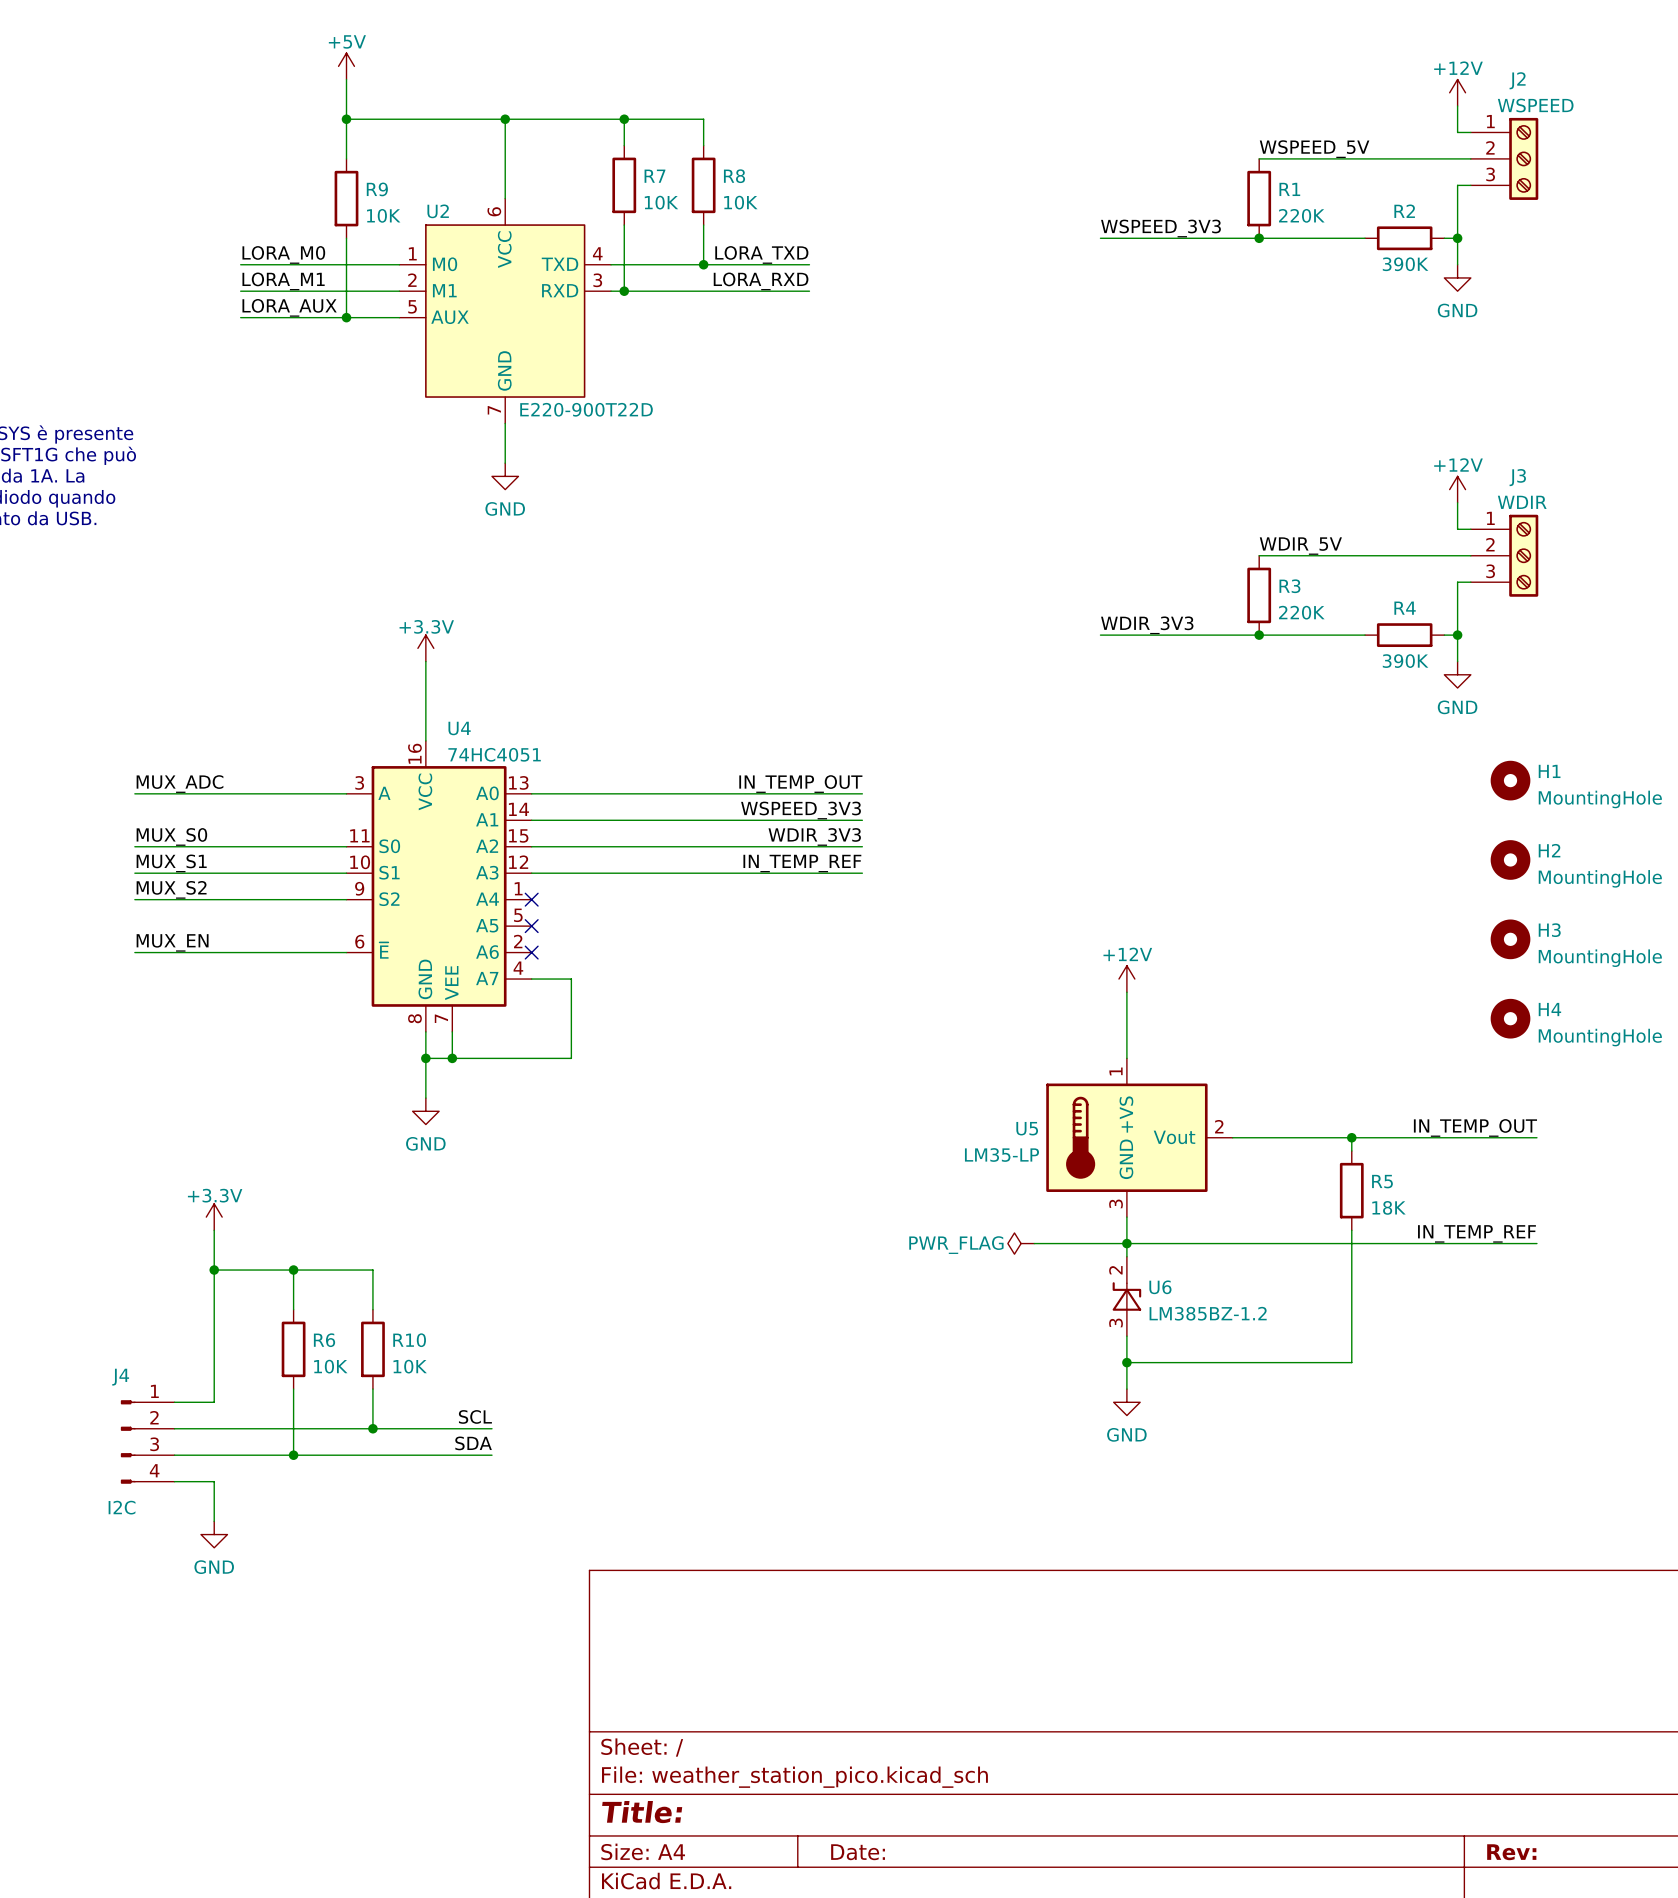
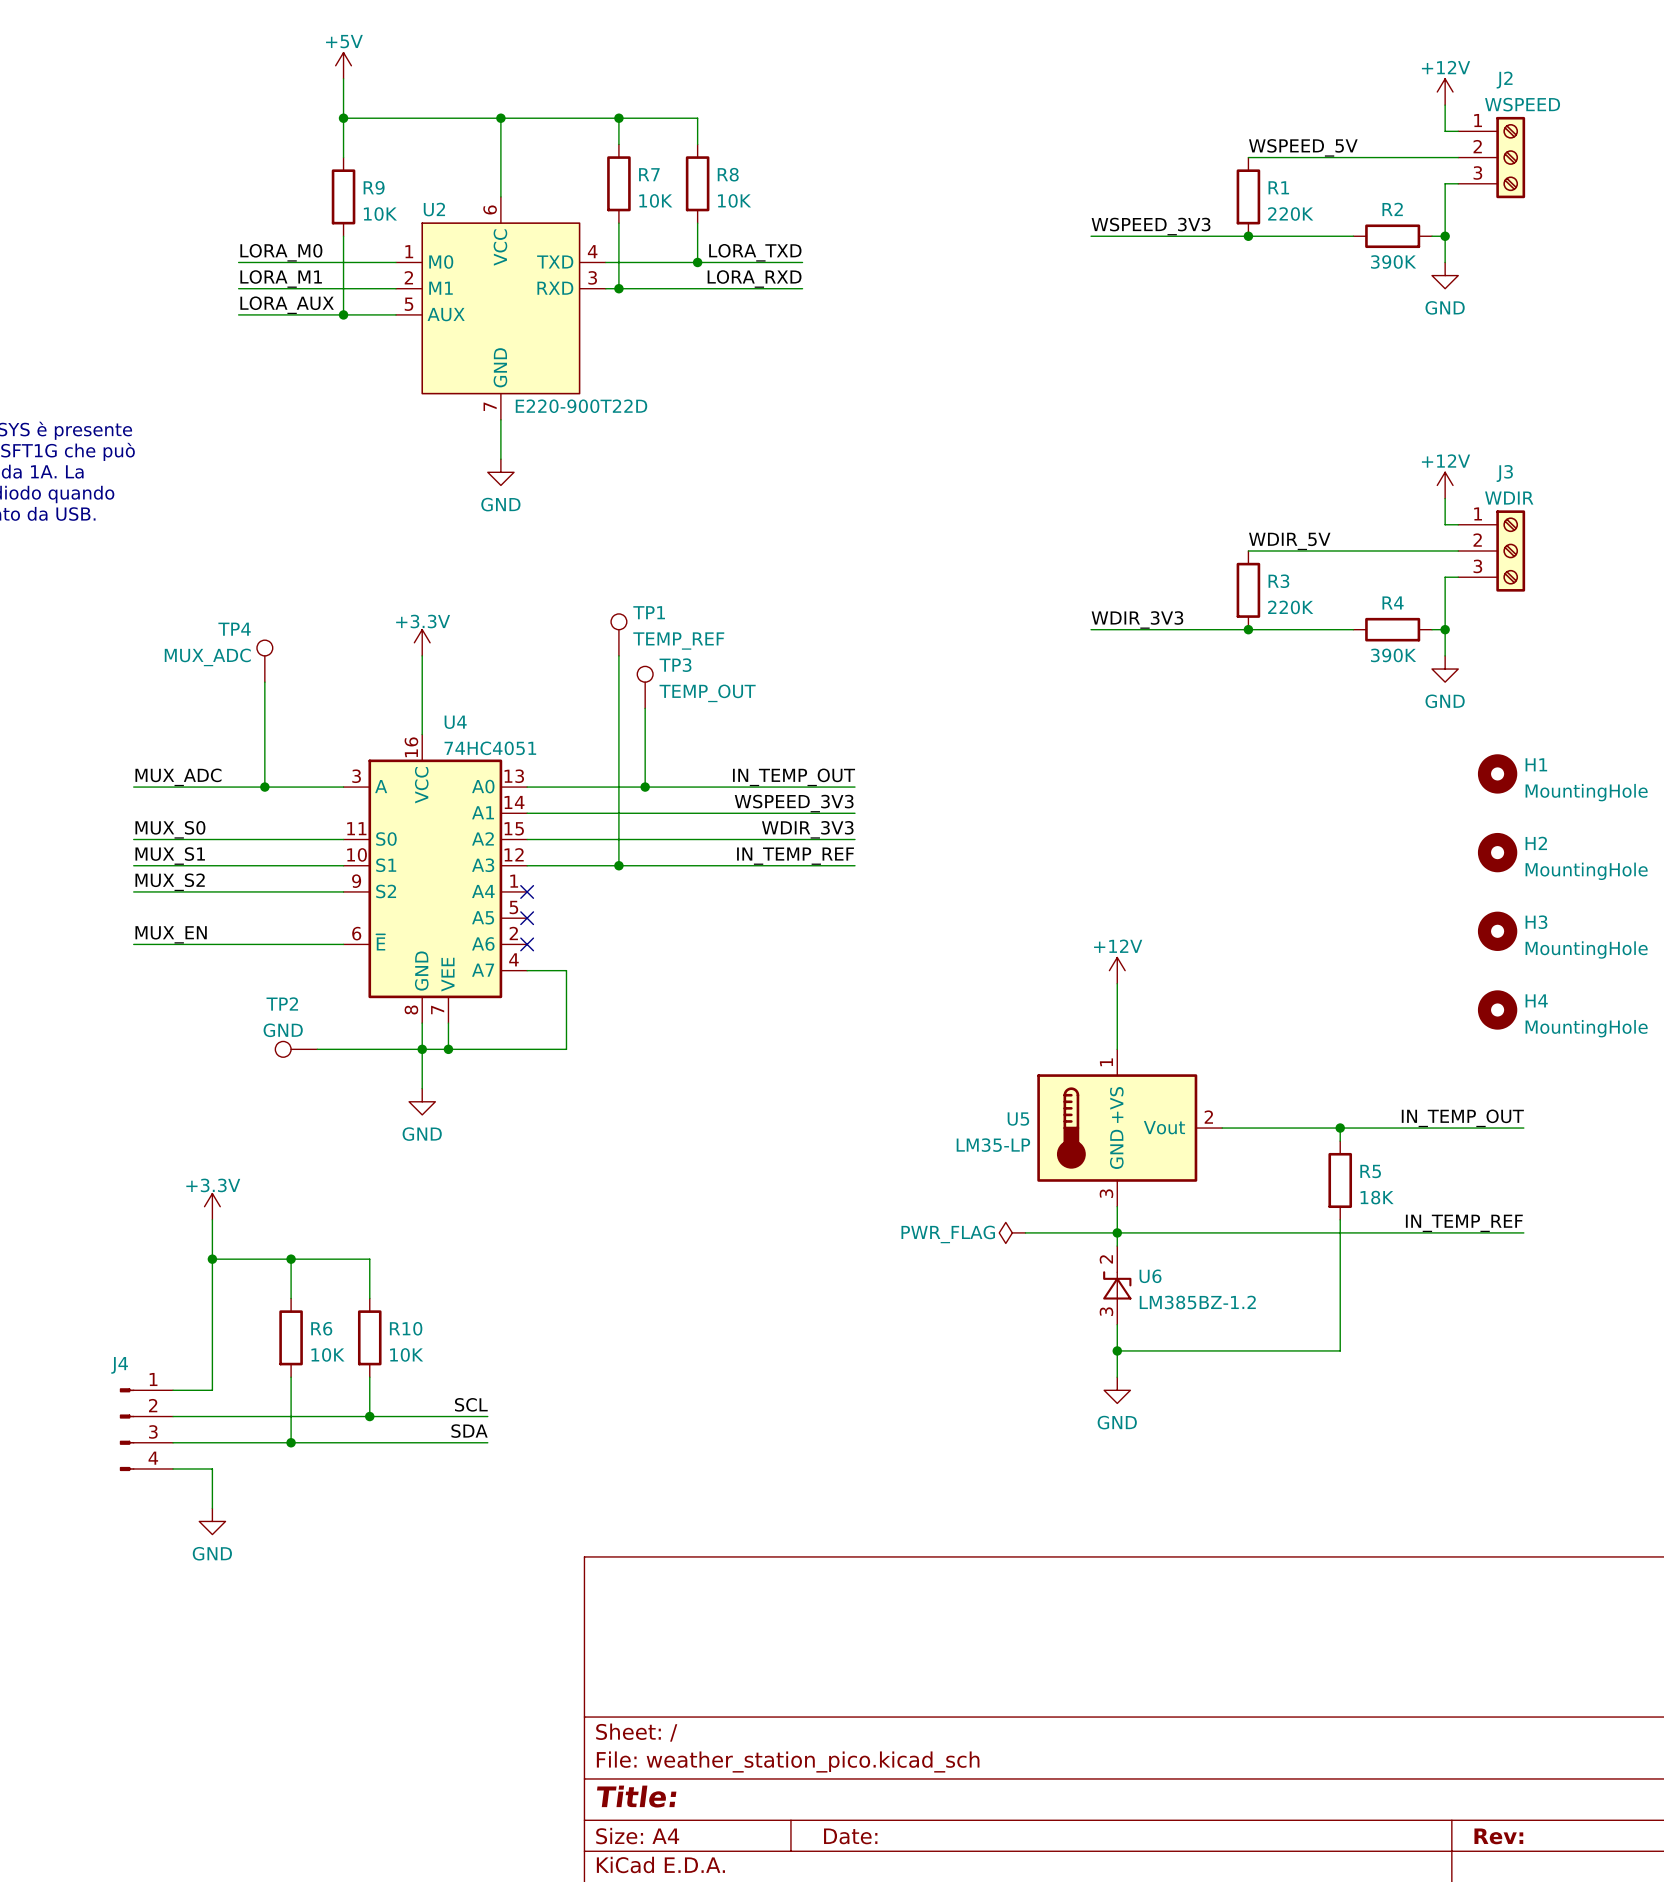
TP1: none -> TEMP_REF (618, 634)
wire: none -> (618, 655) (618, 865)
TP4: none -> MUX_ADC (264, 661)
wire: none -> (264, 682) (264, 787)
TP3: none -> TEMP_OUT (645, 687)
wire: none -> (645, 708) (645, 787)
junction: none -> (264, 787)
junction: none -> (645, 787)
junction: none -> (618, 865)
TP2: none -> GND (296, 1049)
wire: none -> (317, 1049) (422, 1049)
J4 value: I2C (122, 1507) -> none

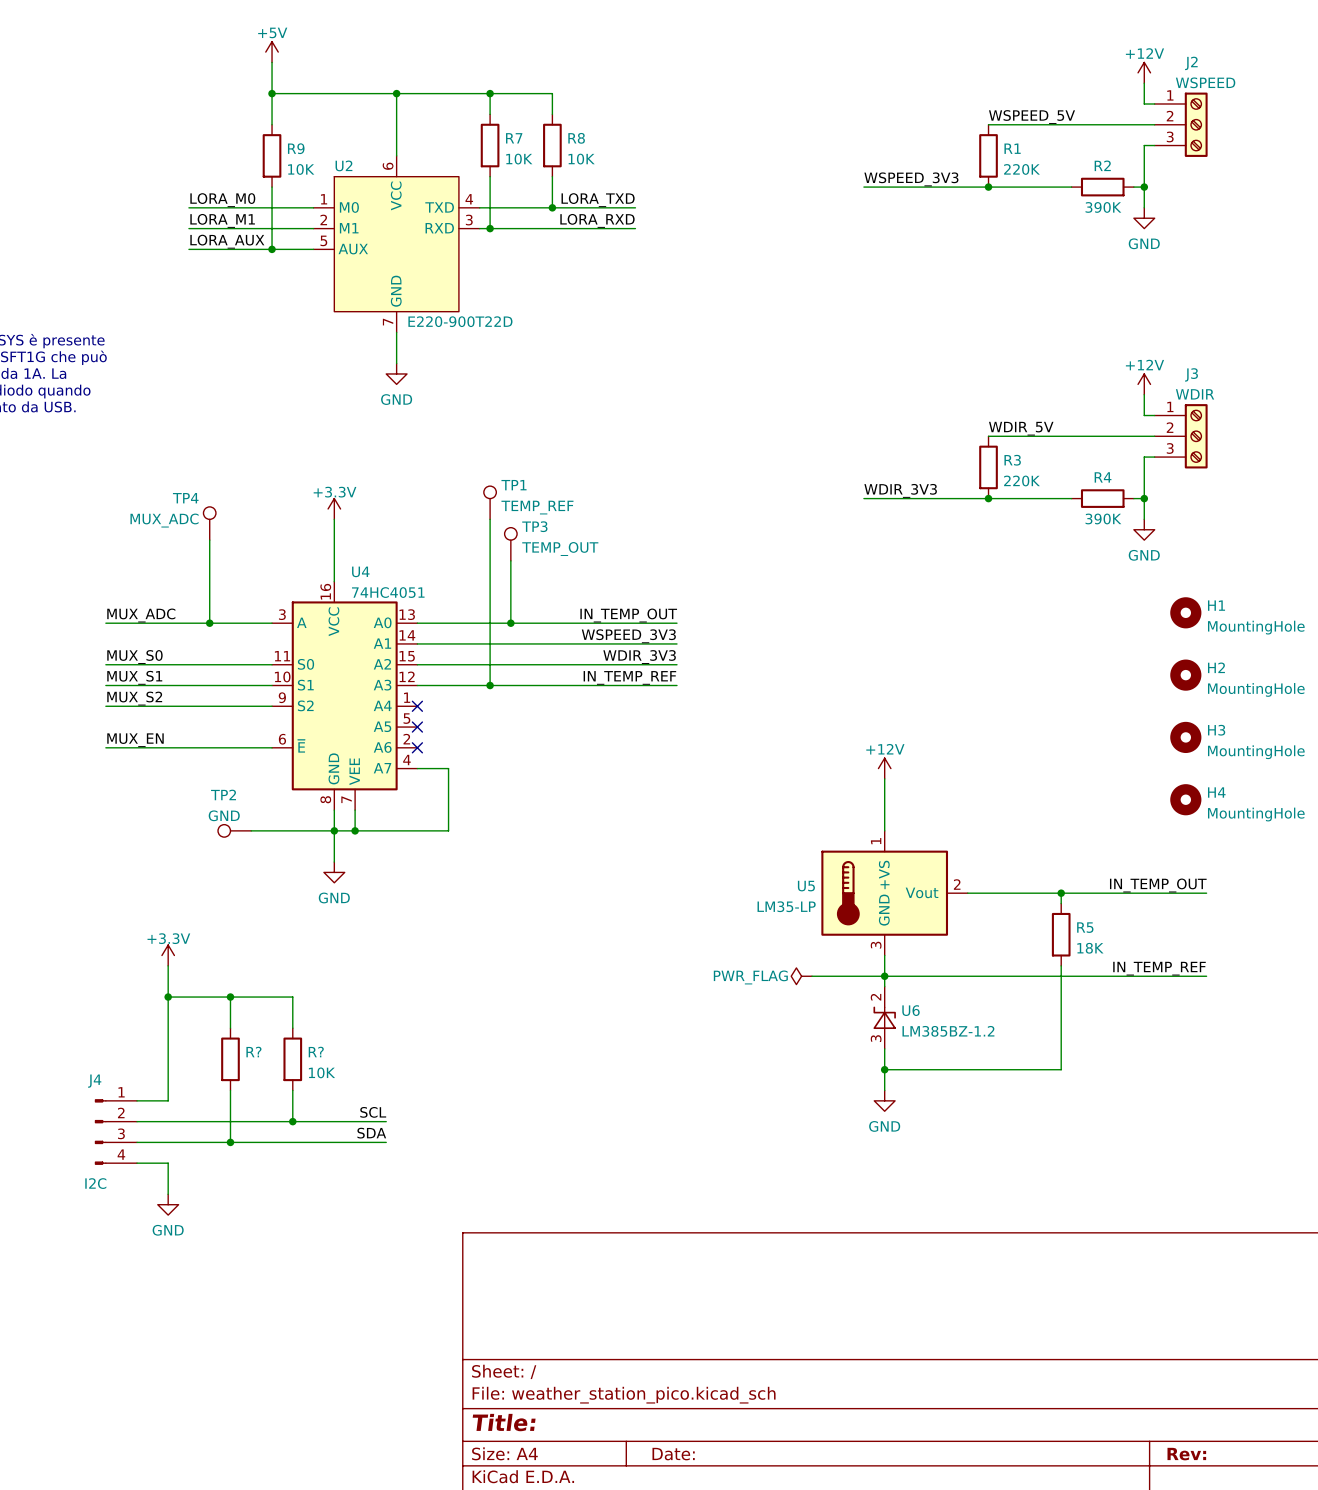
R6 name: R6 (321, 1328) -> R? (253, 1052)
R10 name: R10 (406, 1328) -> R? (316, 1052)
R6 value: 10K (327, 1354) -> none
J4 value: none -> I2C (95, 1183)

